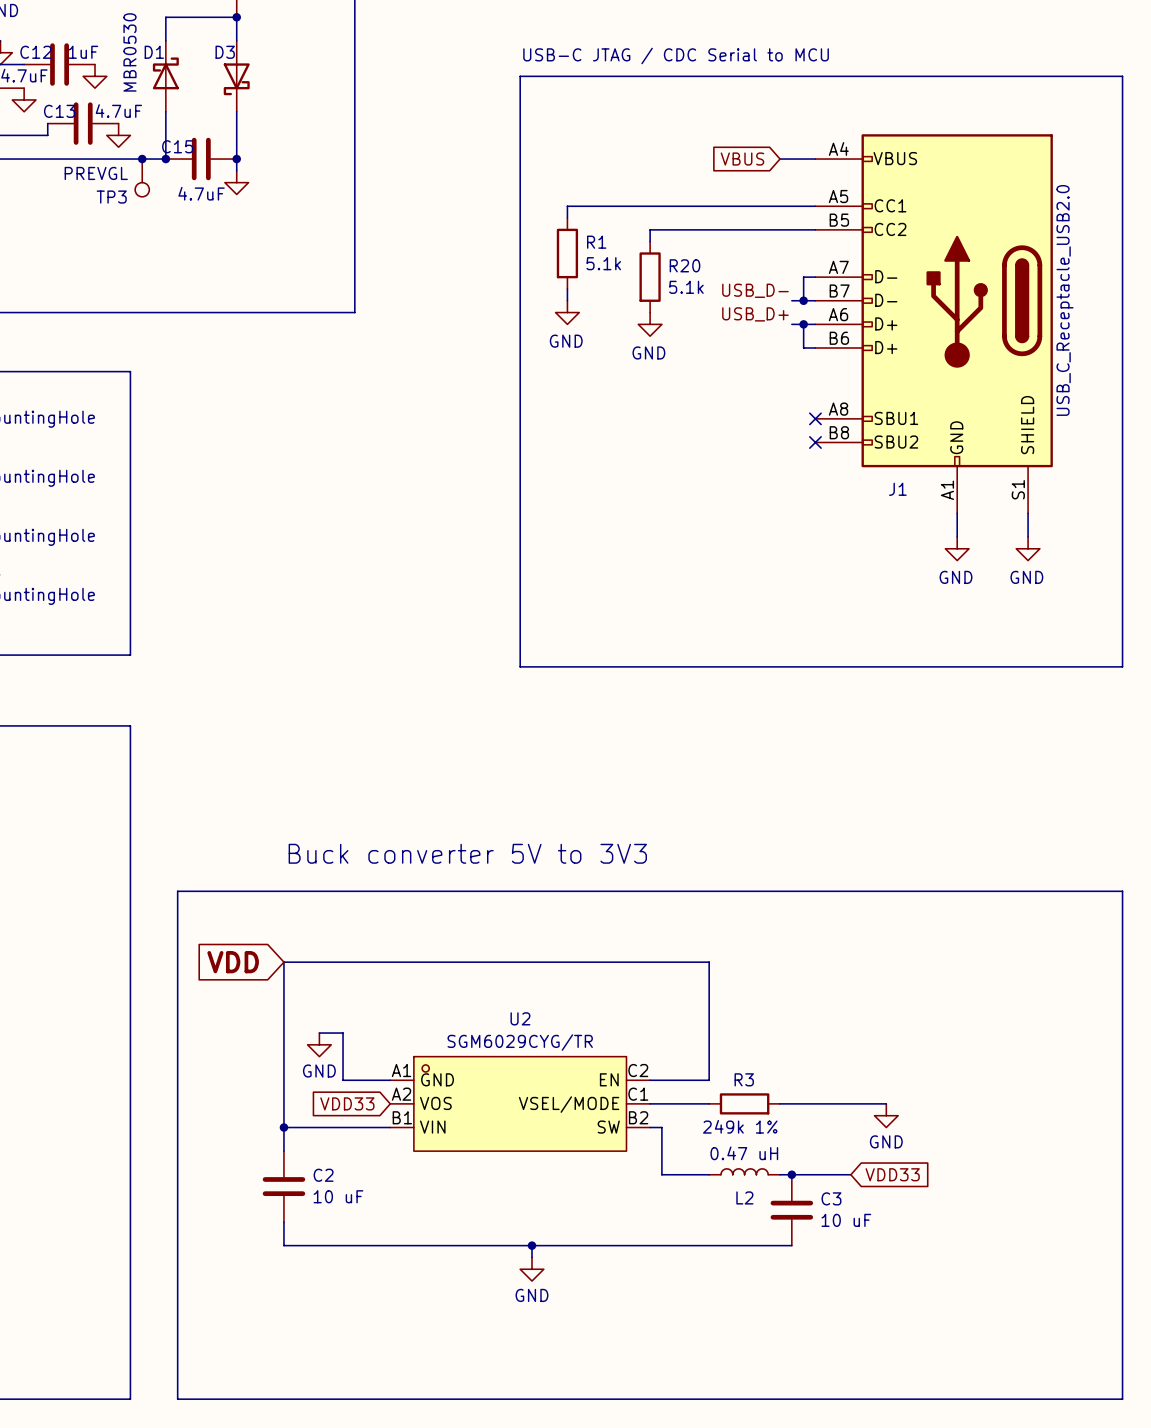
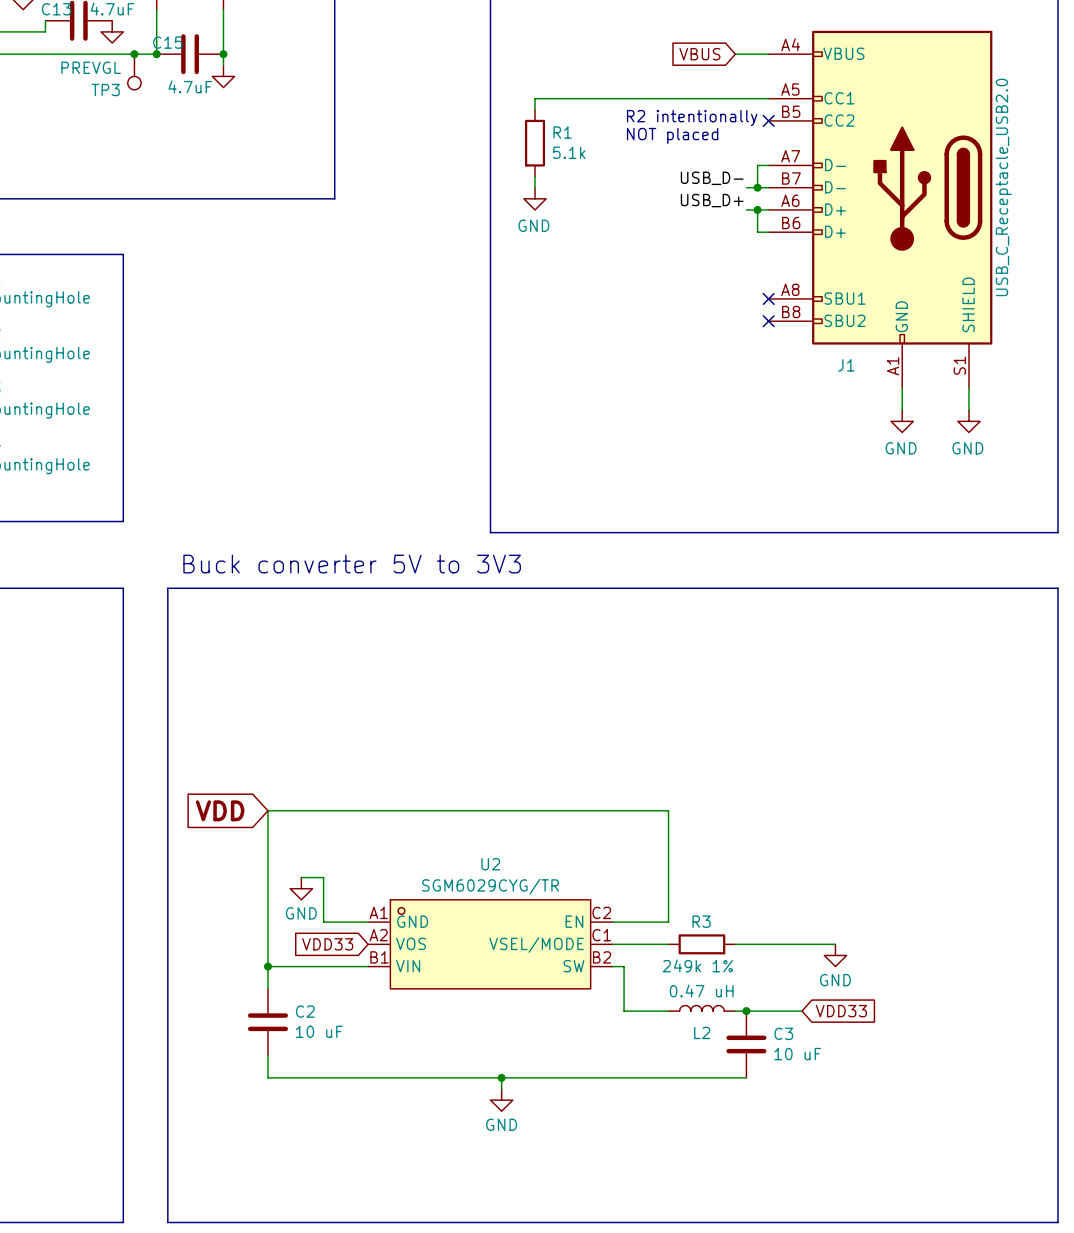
text: none -> R2 intentionally (692, 118)
wire: (815, 229) (650, 229) (650, 241) -> none
no-connect mark: none -> (768, 120)
text: none -> NOT placed (672, 135)
R20: 5.1k (650, 277) -> none
power symbol: GND (650, 324) -> none
text position: Buck converter 5V to 3V3 (467, 853) -> Buck converter 5V to 3V3 (352, 564)
line: (177, 891) (1122, 891) -> (167, 744) (167, 588) (1057, 588) (1057, 744)

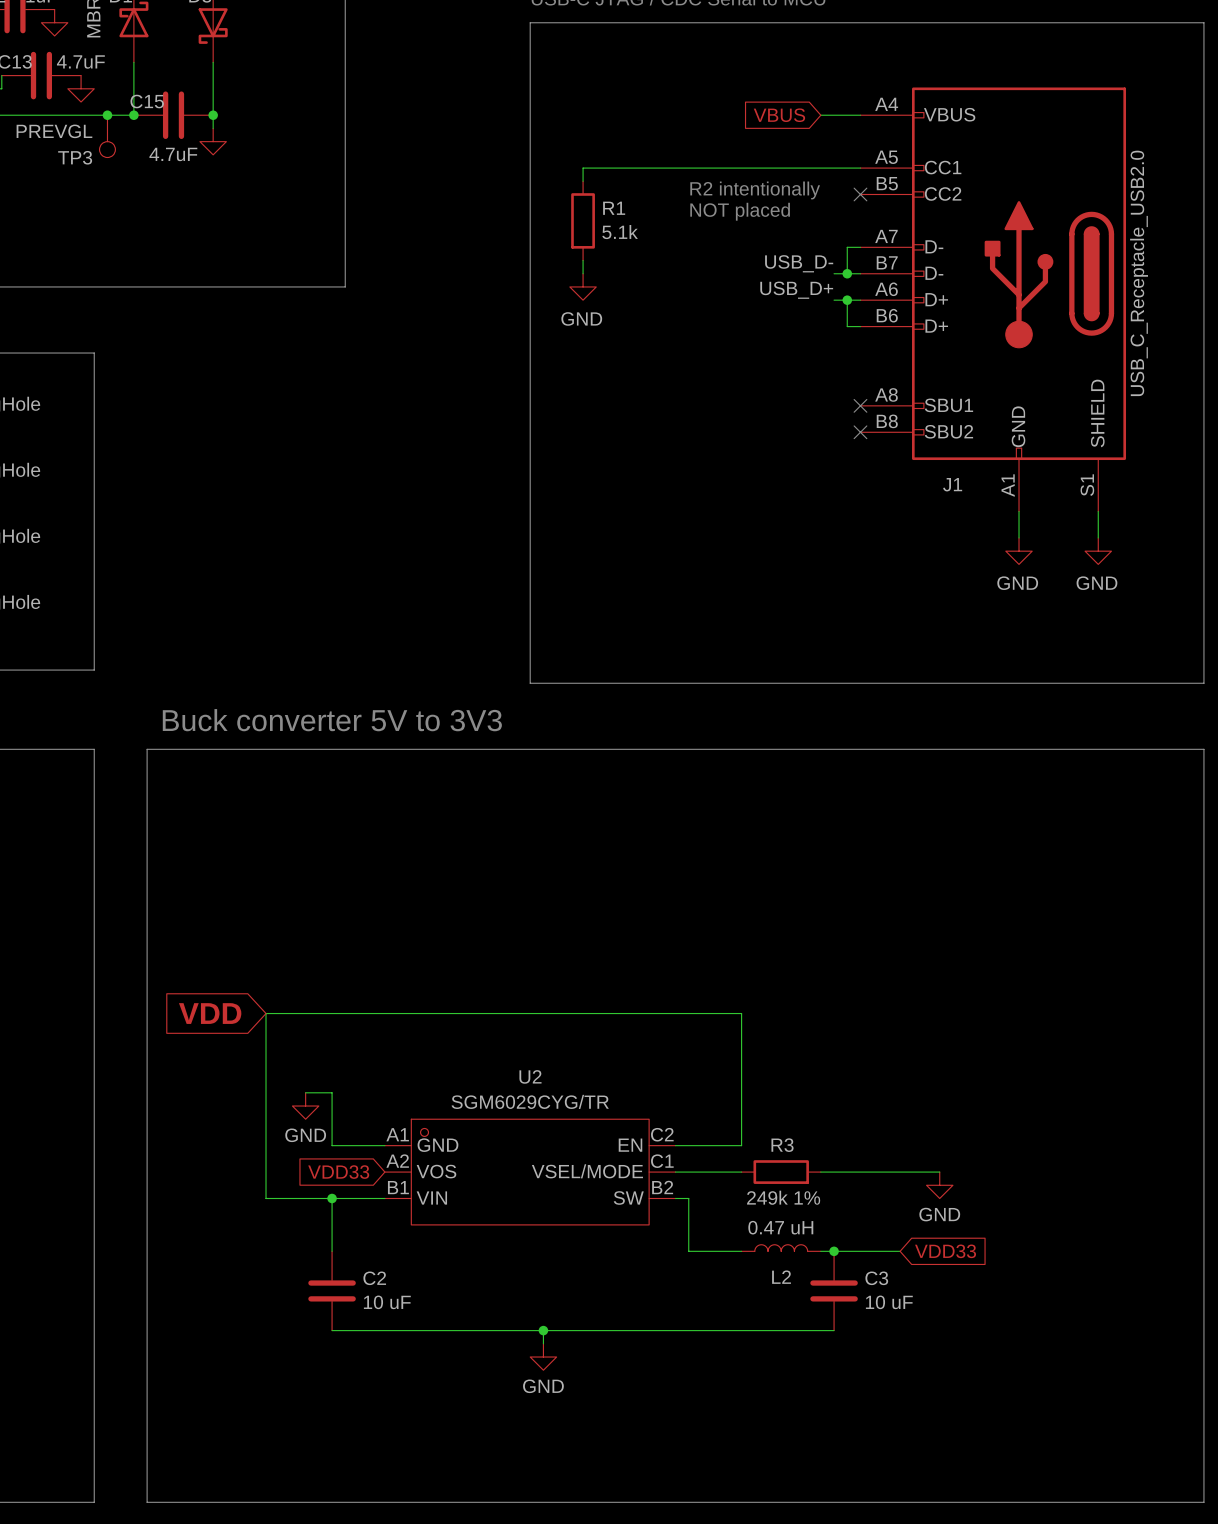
wire: (267, 966) (267, 988) -> none
junction: (267, 966) -> none
wire: none -> (332, 1198) (332, 1251)
junction: none -> (332, 1198)
C2 position: (267, 1022) -> (332, 1290)
wire: (267, 1055) (267, 1077) (323, 1077) -> none

